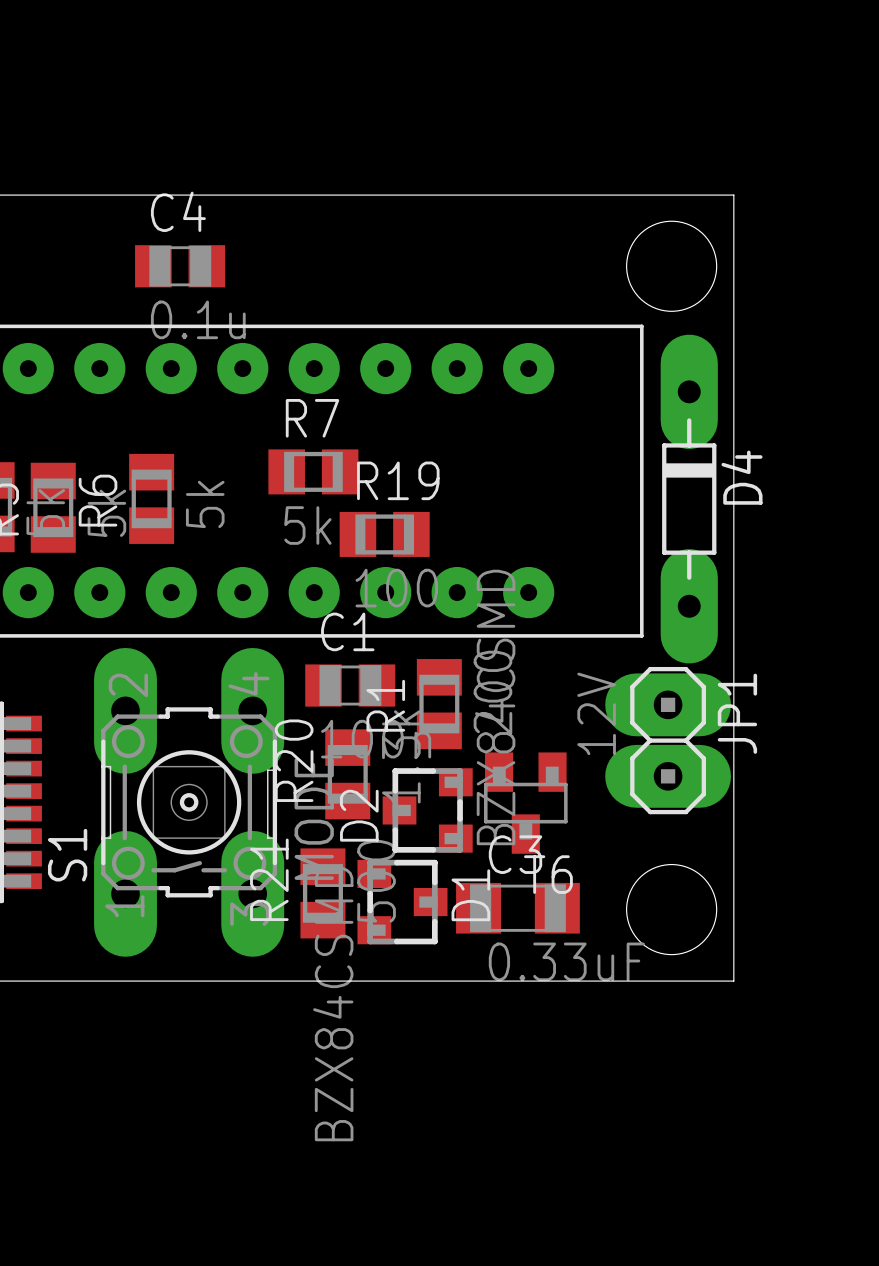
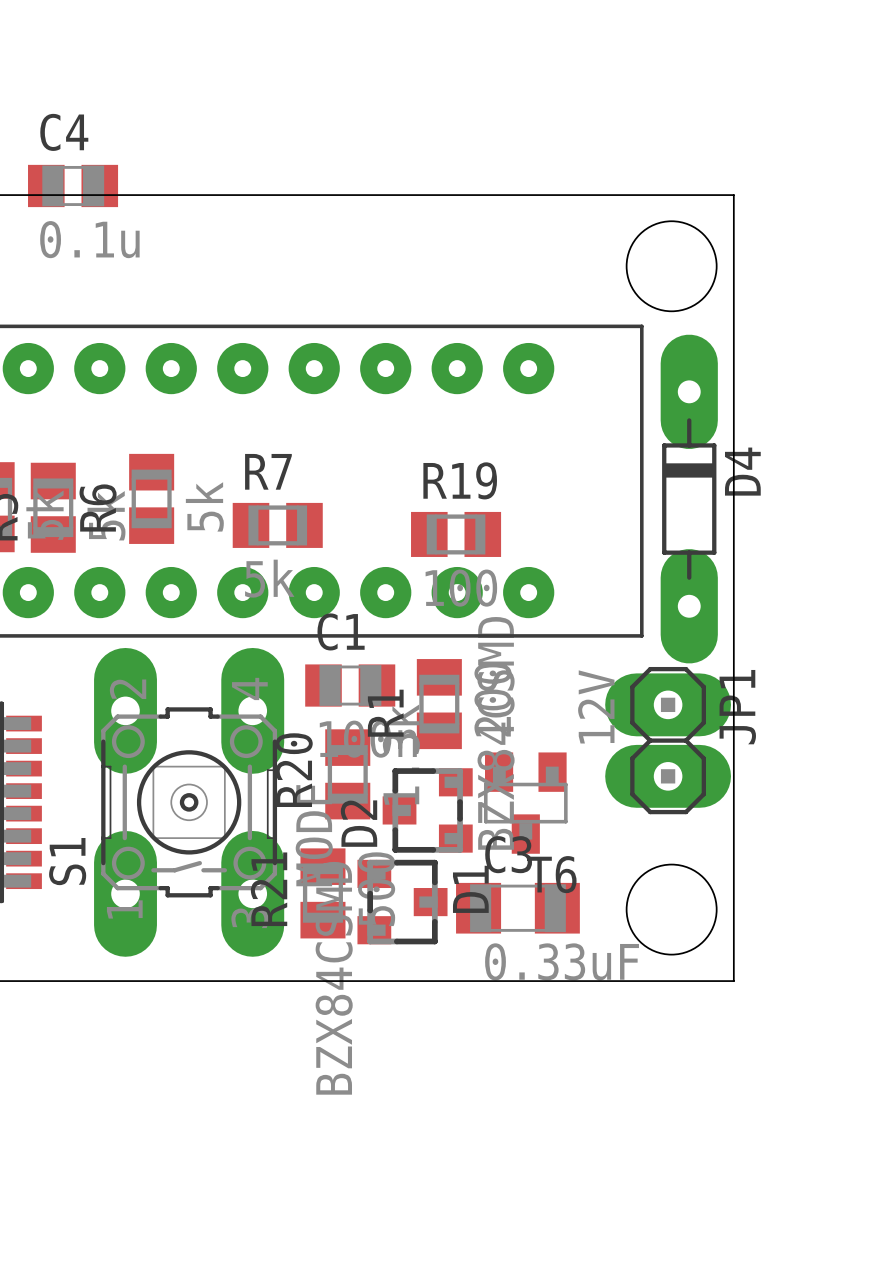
C4 position: (180, 266) -> (73, 185)
R7 position: (313, 471) -> (277, 525)
R19 position: (384, 534) -> (456, 534)

